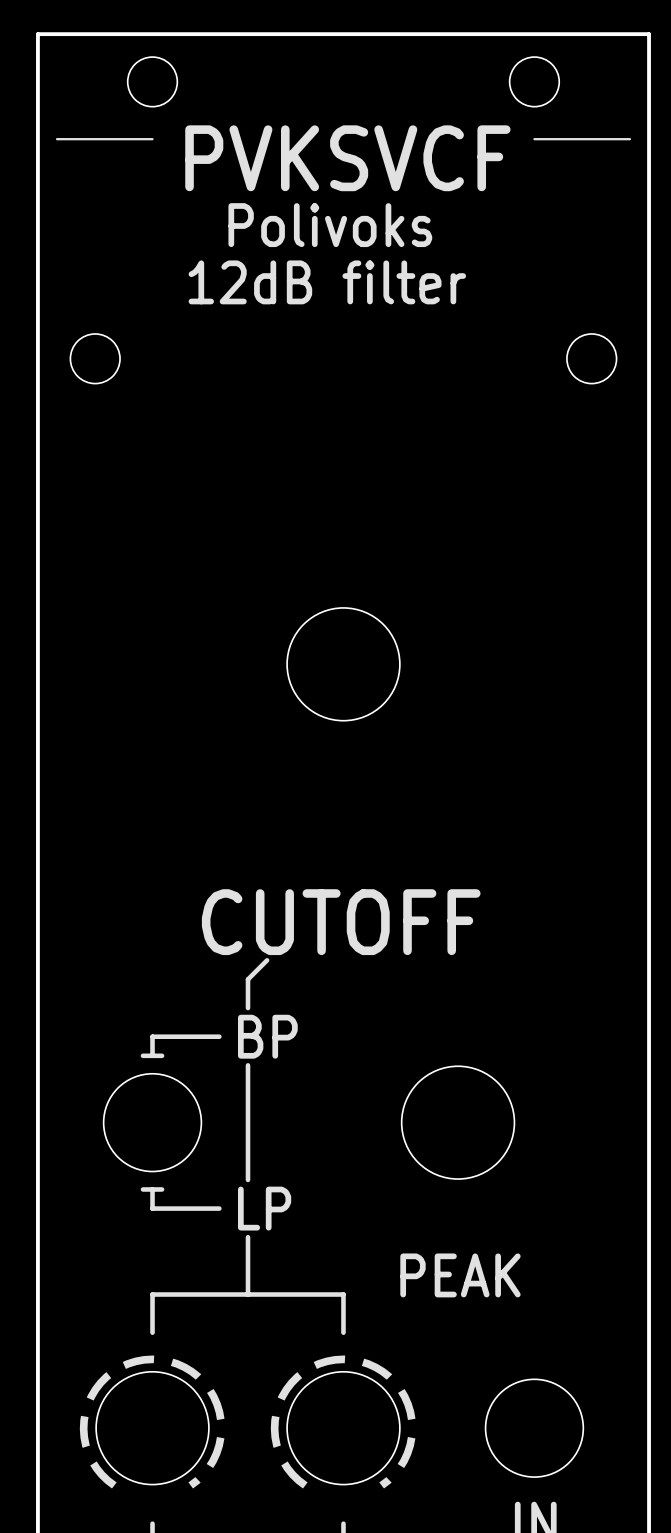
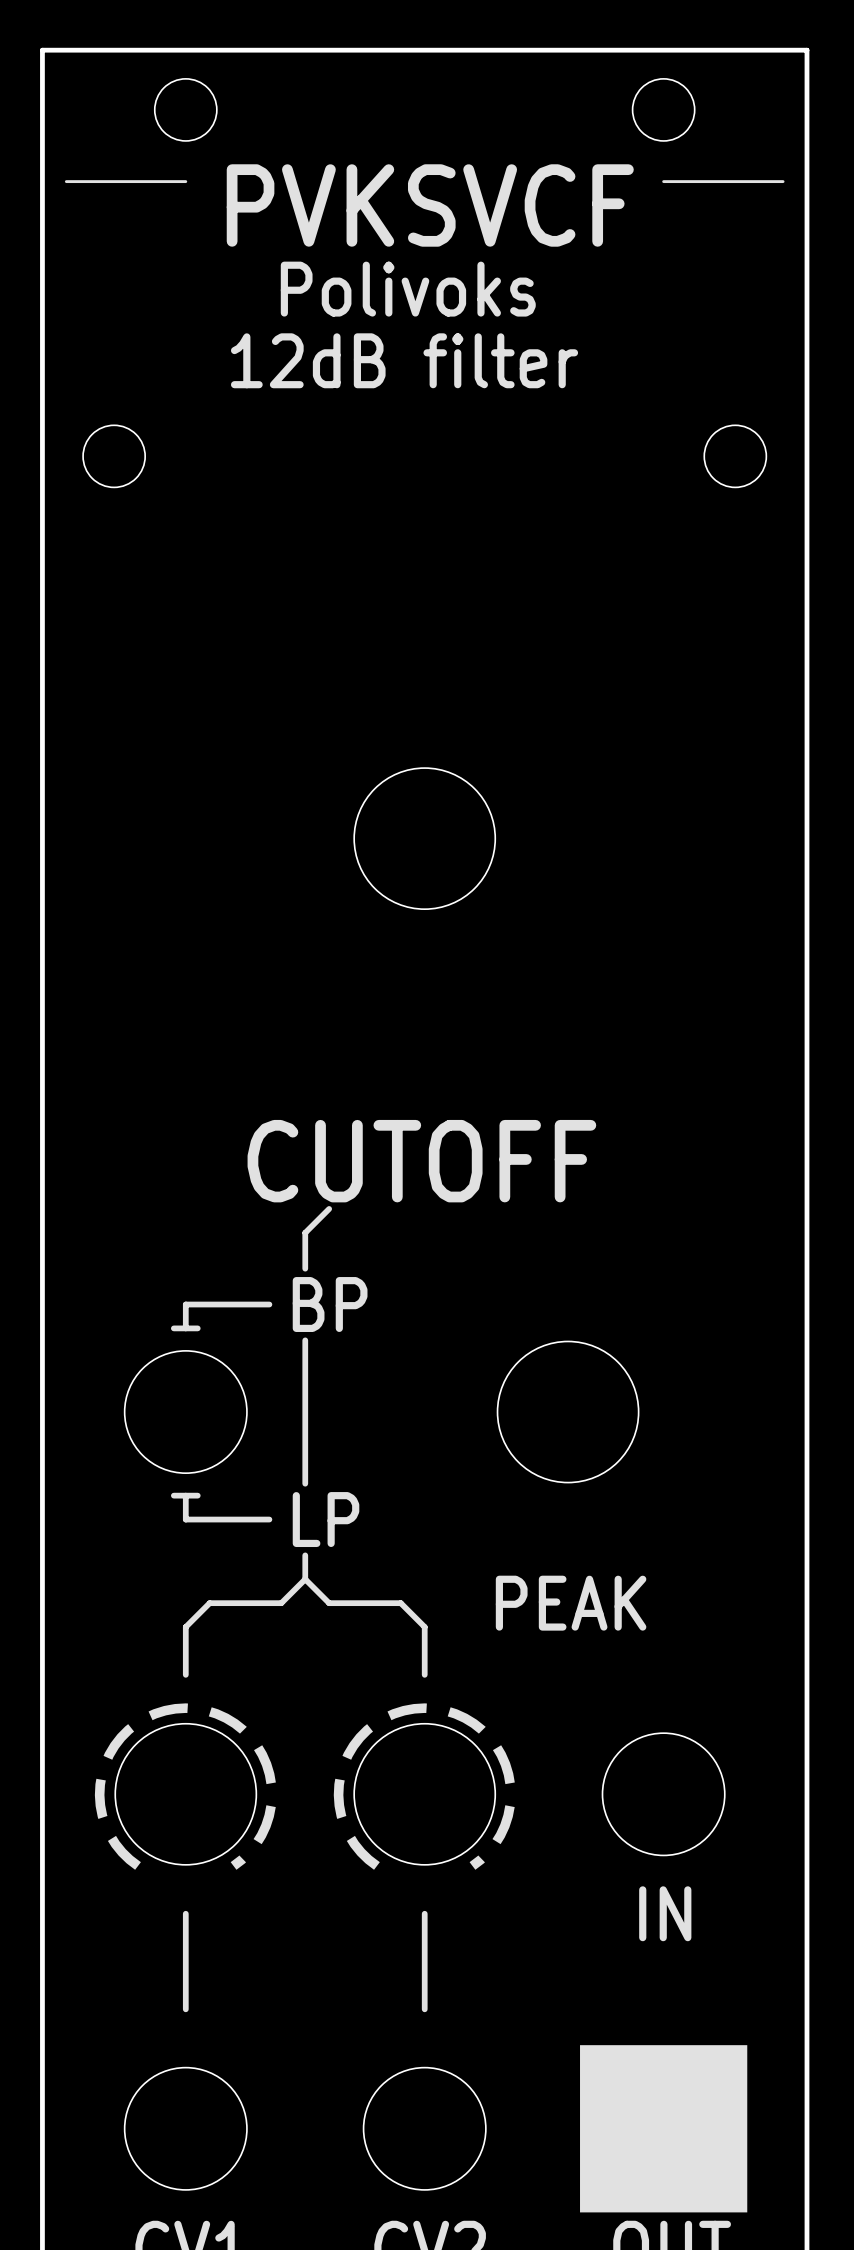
line: (247, 1256) (247, 1294) -> none
line: (152, 1294) (343, 1294) -> (185, 1627) (209, 1603) (281, 1603) (305, 1579) (329, 1603) (400, 1603) (424, 1627)

